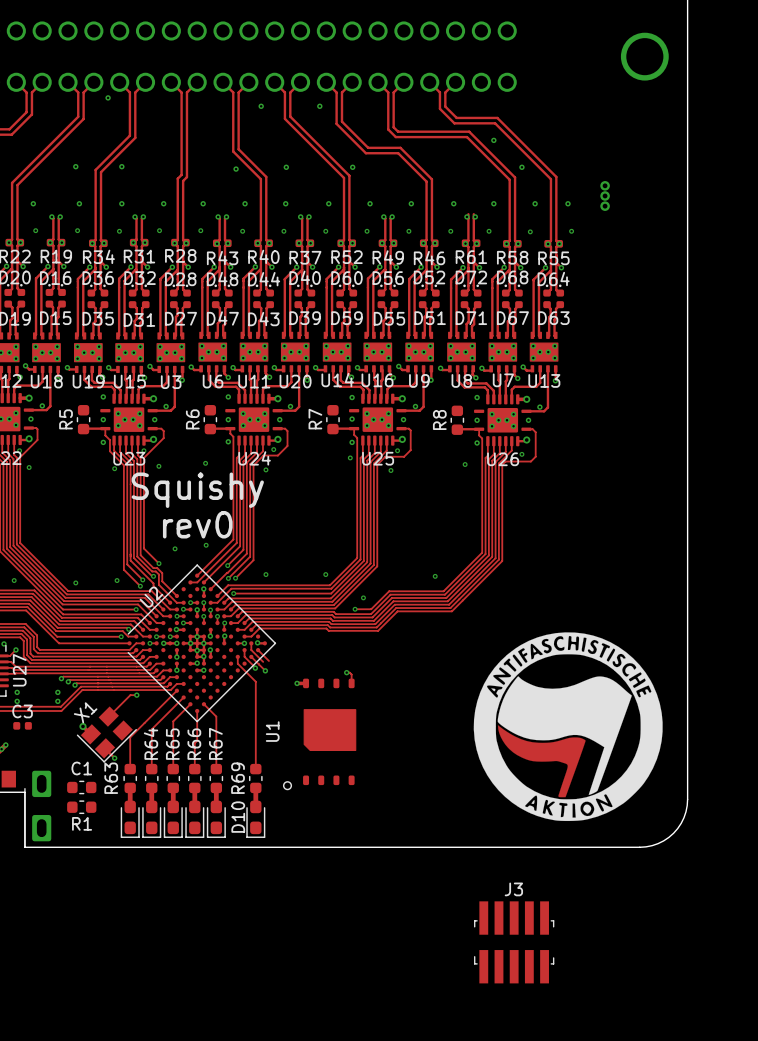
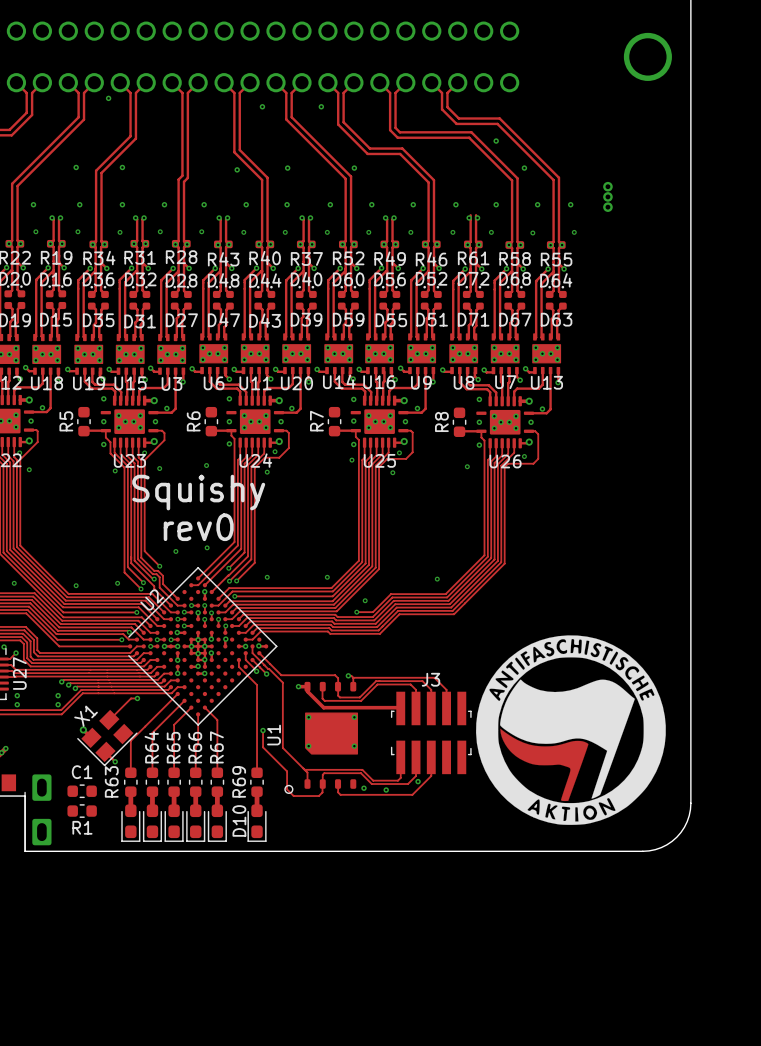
track: none -> (270, 664) (281, 675) (335, 675) (338, 678) (338, 686)
track: none -> (264, 665) (282, 682) (282, 747) (307, 772) (307, 784)
track: none -> (353, 677) (434, 677) (446, 689) (446, 708)
track: none -> (307, 686) (307, 691) (323, 707) (400, 707)
track: none -> (322, 687) (322, 698) (324, 700) (361, 700) (377, 684) (410, 684) (416, 689) (416, 708)
track: none -> (338, 687) (339, 697) (359, 697) (376, 681) (422, 681) (431, 689) (431, 708)
via: none -> (308, 717)
via: none -> (354, 717)
C3: (22, 725) -> none
track: none -> (263, 730) (263, 747) (287, 771) (287, 789) (293, 796) (318, 796) (322, 792) (322, 784)
via: none -> (263, 730)
via: none -> (308, 746)
via: none -> (354, 746)
track: none -> (400, 757) (400, 777) (397, 780) (373, 780) (362, 769) (304, 769)
track: none -> (416, 757) (416, 775) (408, 784) (371, 784) (360, 773) (324, 773) (322, 784)
track: none -> (431, 757) (431, 775) (412, 794) (340, 794) (338, 792) (338, 784)
via: none -> (418, 781)
via: none -> (363, 788)
via: none -> (386, 790)
J3 position: (514, 942) -> (431, 732)

